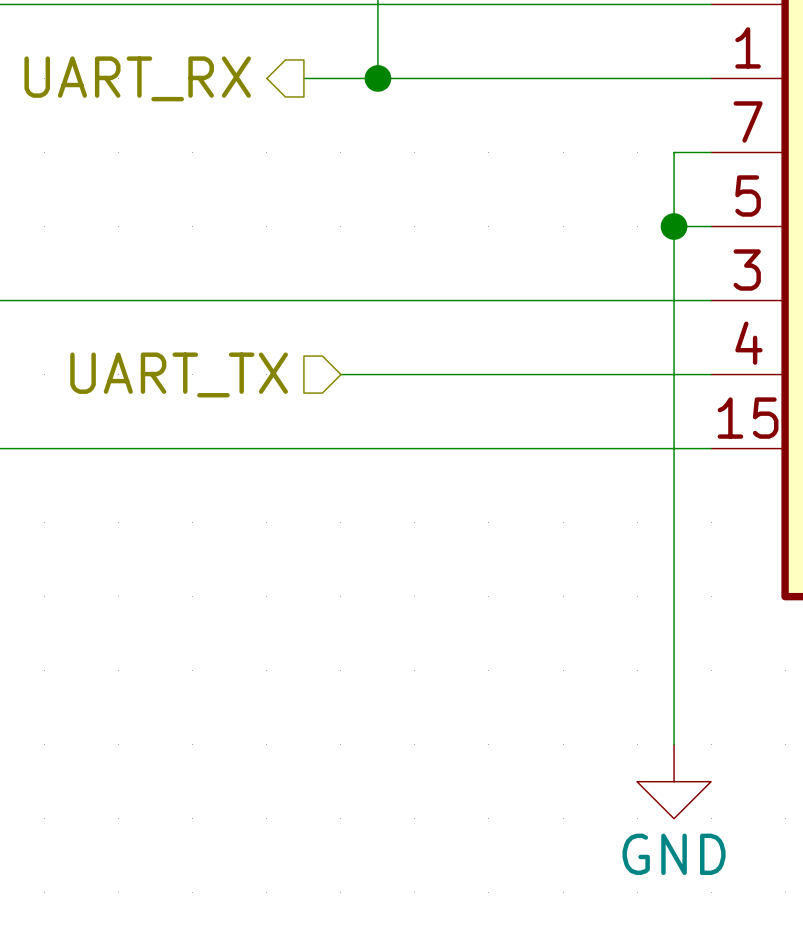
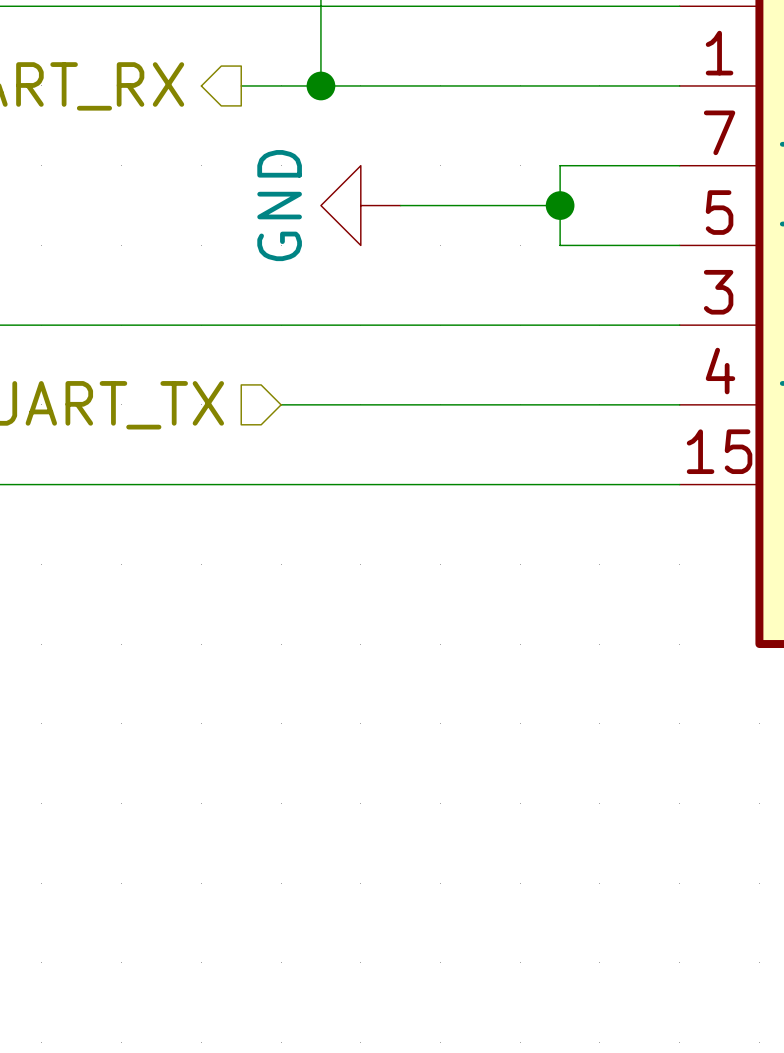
wire: (674, 152) (674, 744) -> (639, 165) (560, 165) (560, 245) (639, 245)
wire: none -> (400, 205) (560, 205)
junction position: (674, 226) -> (560, 205)
power symbol rotation: 0° (674, 781) -> 90° clockwise (360, 205)
power symbol position: GND (674, 781) -> GND (360, 205)

